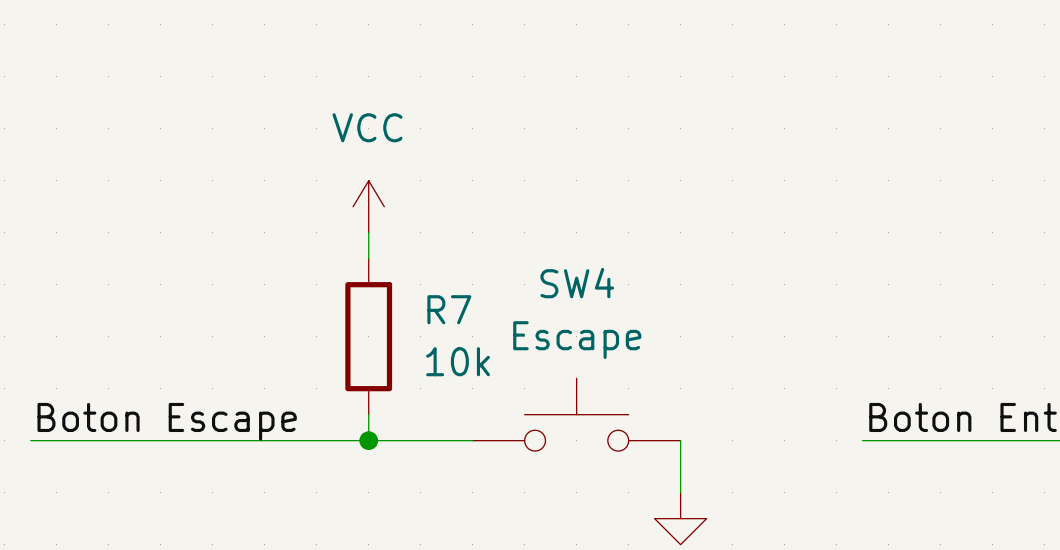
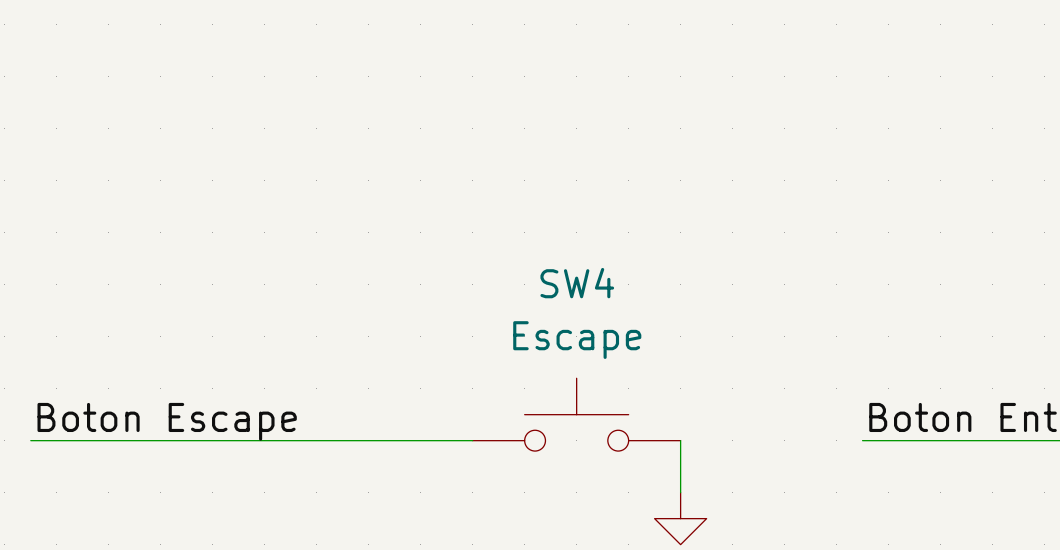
power symbol: VCC (368, 206) -> none
wire: (368, 232) (368, 258) -> none
R7: 10k (368, 336) -> none
wire: (368, 414) (368, 440) -> none
junction: (368, 440) -> none

